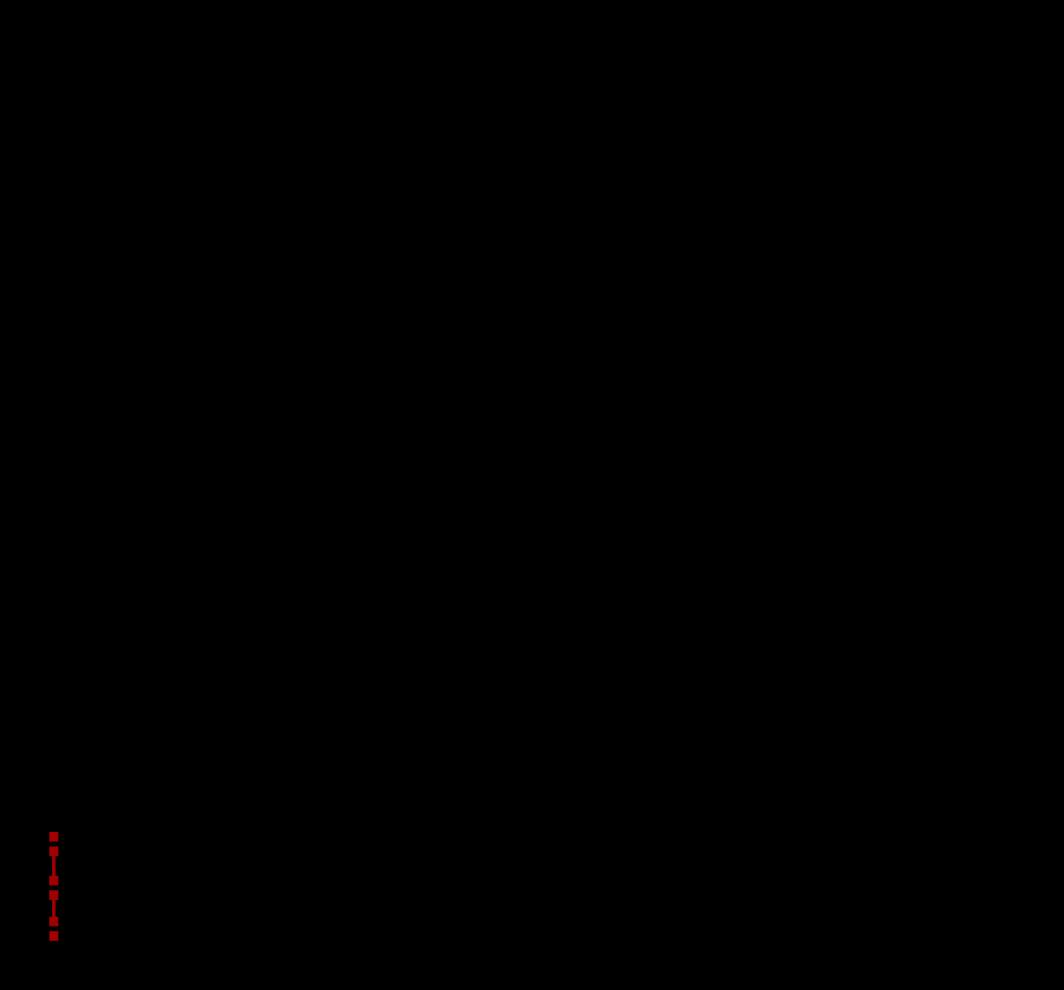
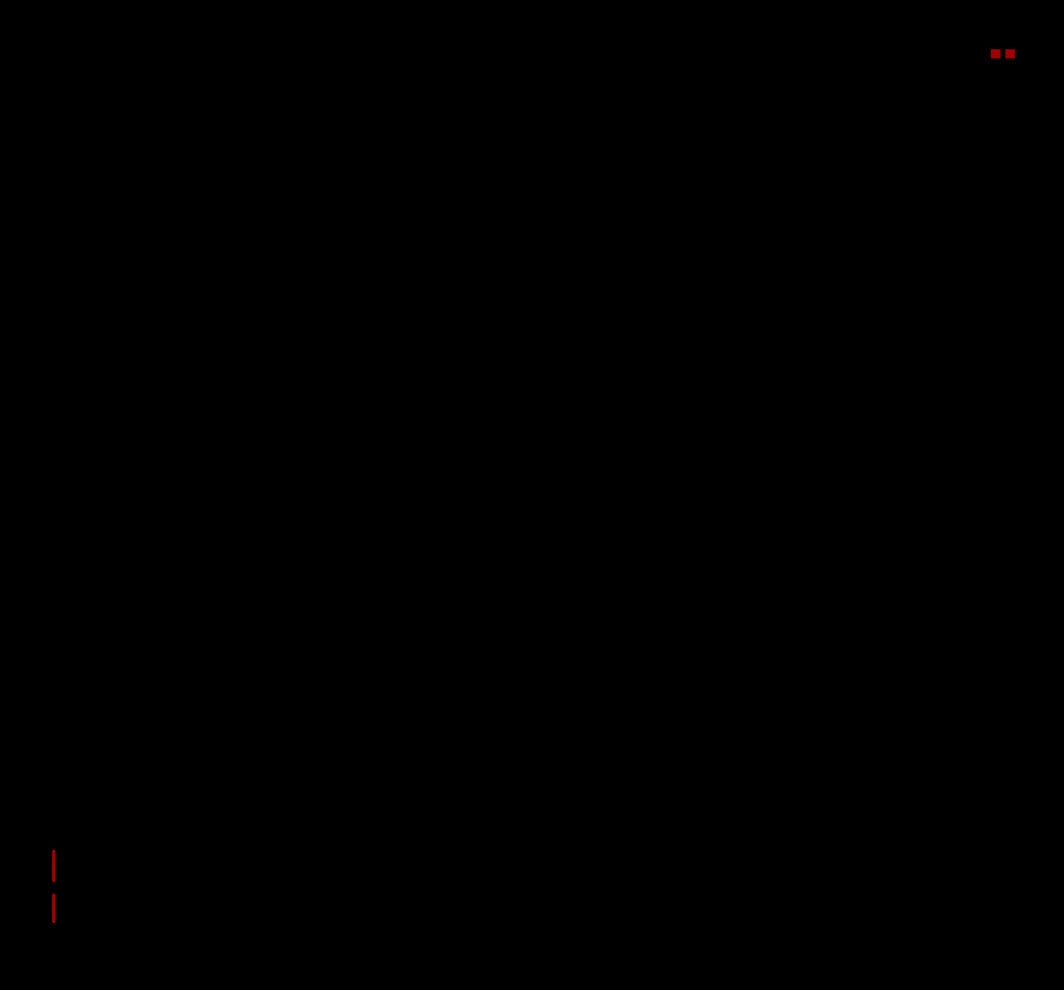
part: none -> (1002, 53)
part: (53, 844) -> none
part: (53, 887) -> none
part: (53, 928) -> none

